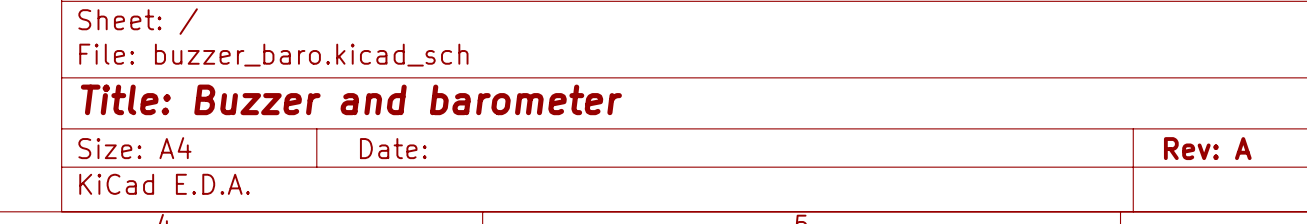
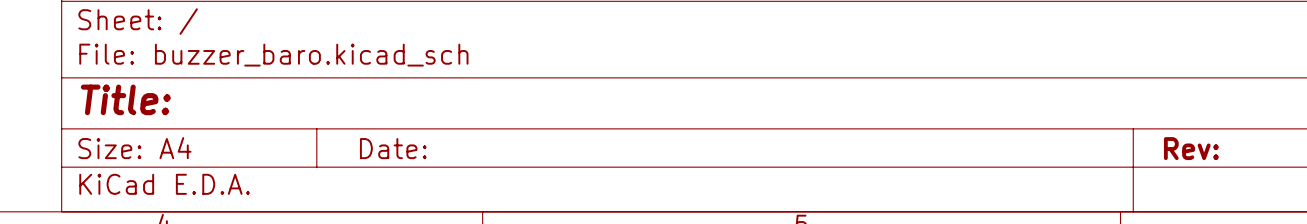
title block: Title: Buzzer and barometer (351, 99) -> Title: (125, 99)
title block: Rev: A (1207, 148) -> Rev: (1191, 148)

